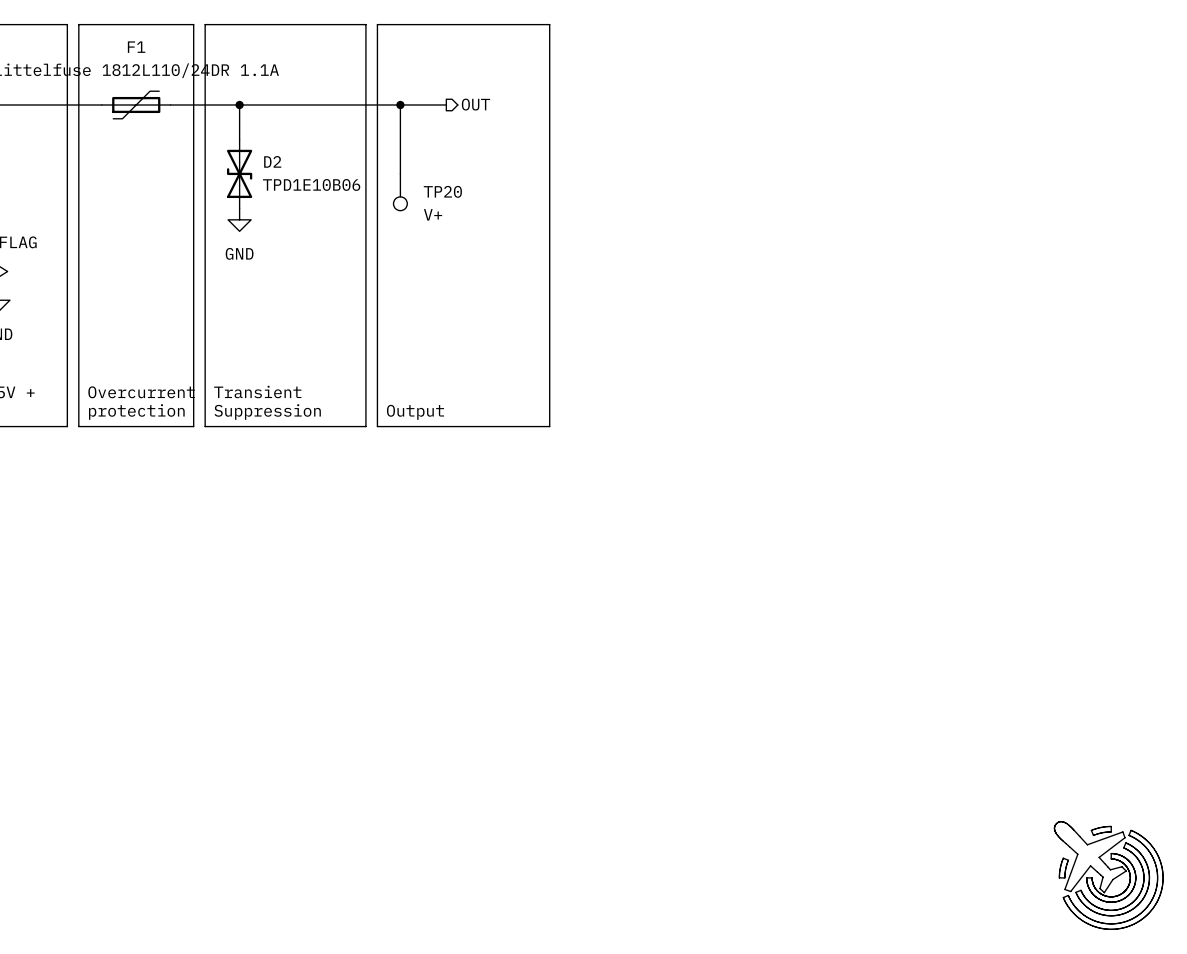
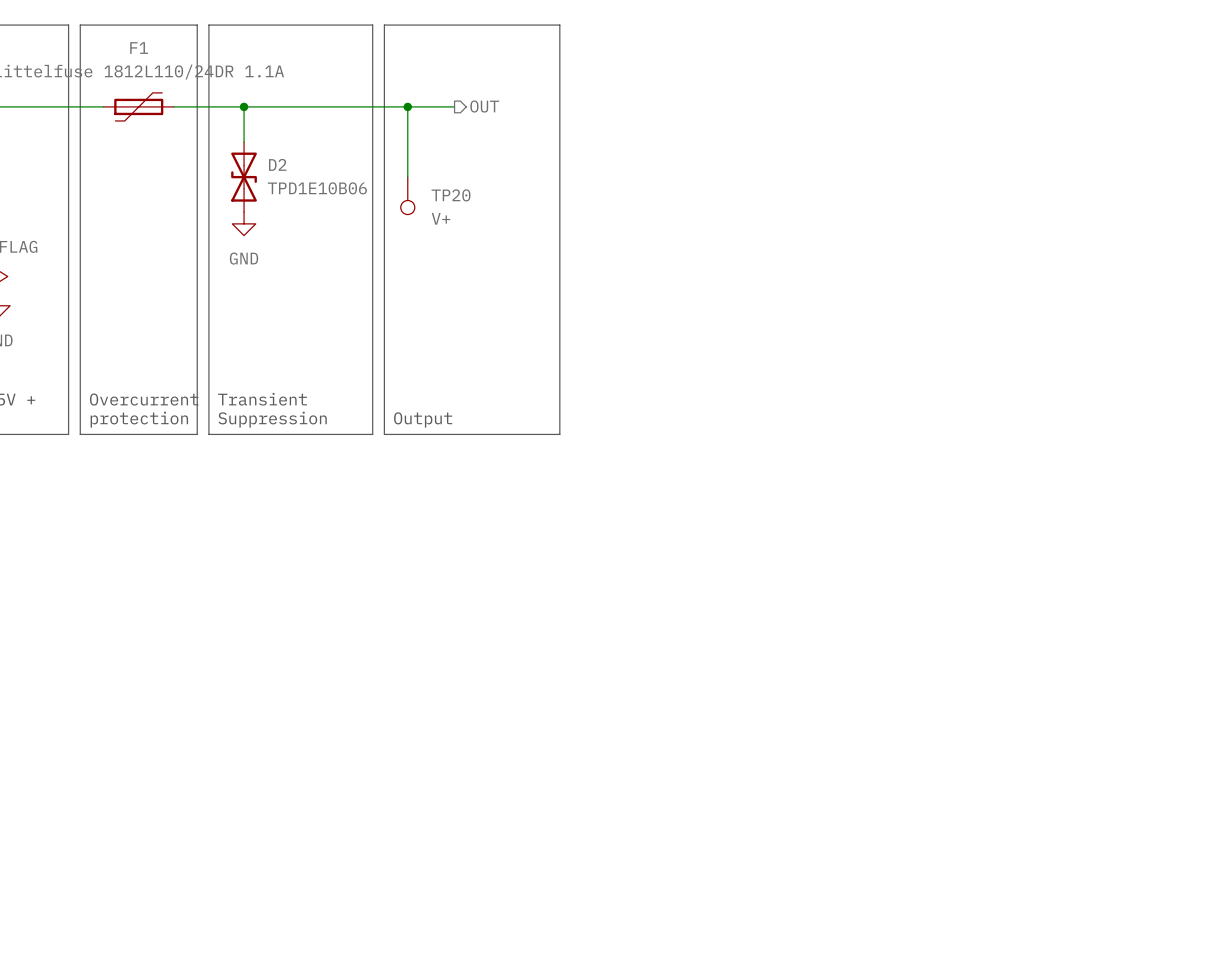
line: (1060, 821) (1055, 825) (1055, 832) (1077, 854) (1064, 889) (1070, 891) (1090, 865) (1103, 877) (1100, 888) (1104, 892) (1112, 879) (1126, 871) (1122, 866) (1110, 869) (1099, 857) (1125, 837) (1122, 831) (1087, 844) (1069, 825) (1060, 821) -> none
line: (1111, 826) (1111, 831) (1093, 835) (1091, 830) (1111, 826) -> none
line: (1131, 830) (1129, 835) (1144, 846) (1155, 863) (1157, 880) (1153, 896) (1146, 907) (1136, 916) (1124, 921) (1111, 923) (1100, 922) (1088, 917) (1076, 908) (1068, 895) (1063, 897) (1074, 914) (1090, 924) (1109, 929) (1129, 925) (1146, 915) (1158, 898) (1163, 877) (1159, 858) (1147, 841) (1131, 830) -> none
line: (1125, 842) (1123, 847) (1134, 855) (1142, 867) (1143, 879) (1141, 891) (1129, 904) (1112, 910) (1093, 904) (1081, 890) (1075, 892) (1084, 904) (1095, 912) (1110, 915) (1124, 913) (1137, 905) (1146, 893) (1149, 878) (1146, 864) (1138, 851) (1125, 842) -> none
line: (1111, 853) (1111, 858) (1122, 862) (1129, 871) (1129, 882) (1124, 891) (1115, 896) (1104, 895) (1095, 888) (1092, 877) (1086, 877) (1088, 887) (1093, 895) (1101, 900) (1111, 902) (1120, 900) (1128, 895) (1133, 887) (1135, 877) (1133, 868) (1128, 860) (1120, 855) (1111, 853) -> none
line: (1063, 858) (1060, 867) (1059, 877) (1064, 877) (1068, 860) (1063, 858) -> none

